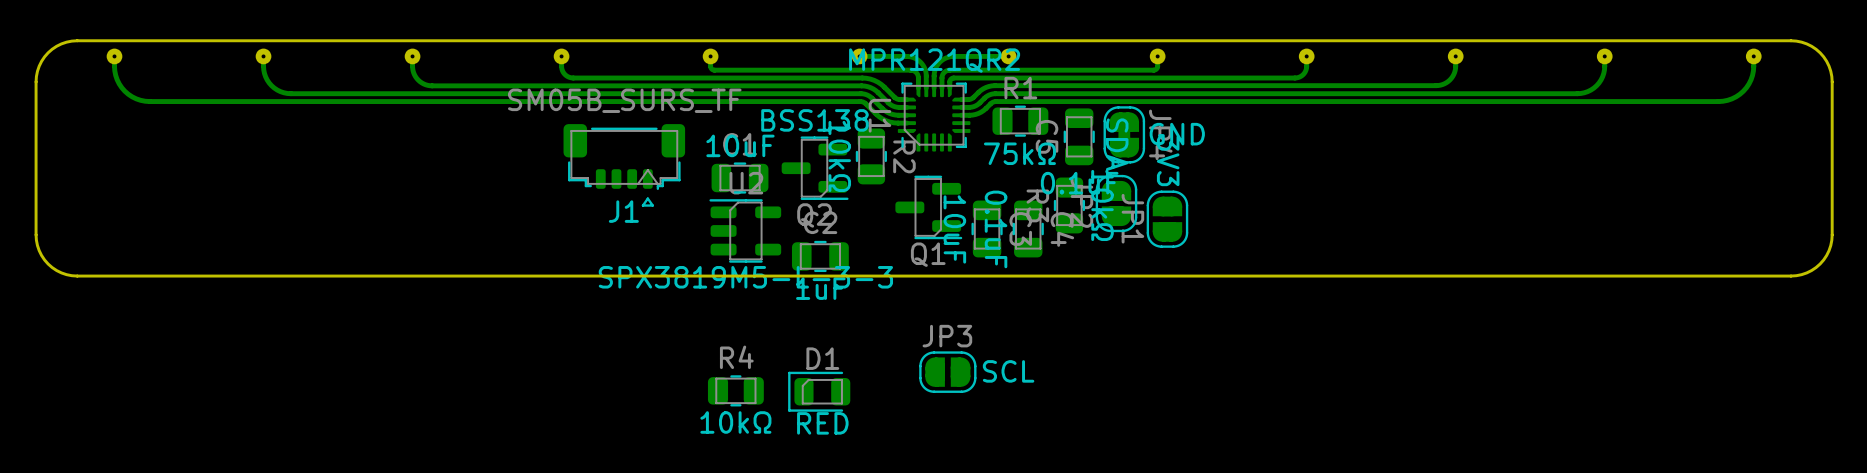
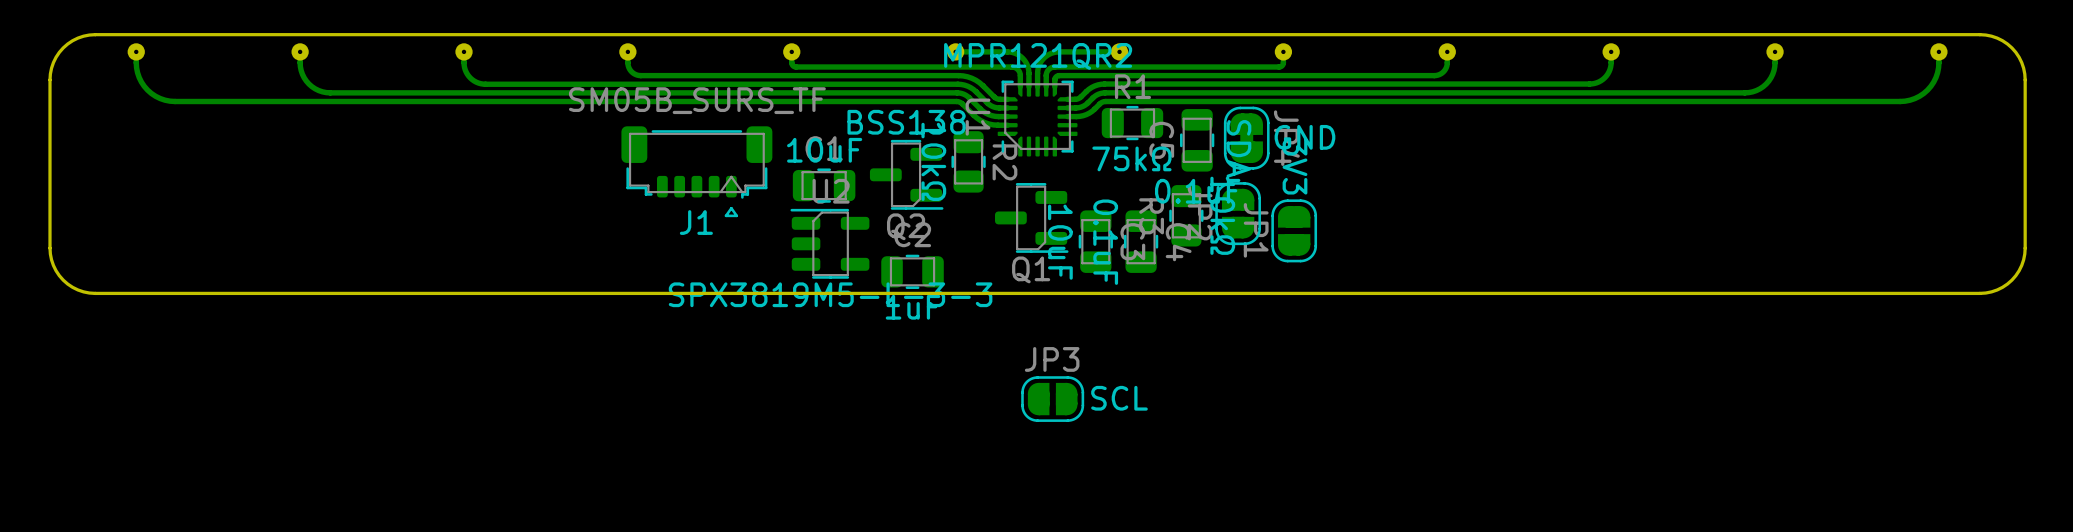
J1 footprint: [563, 124, 686, 207] -> [621, 126, 773, 218]
R4: 10kΩ (735, 390) -> none
D1: RED (819, 391) -> none

